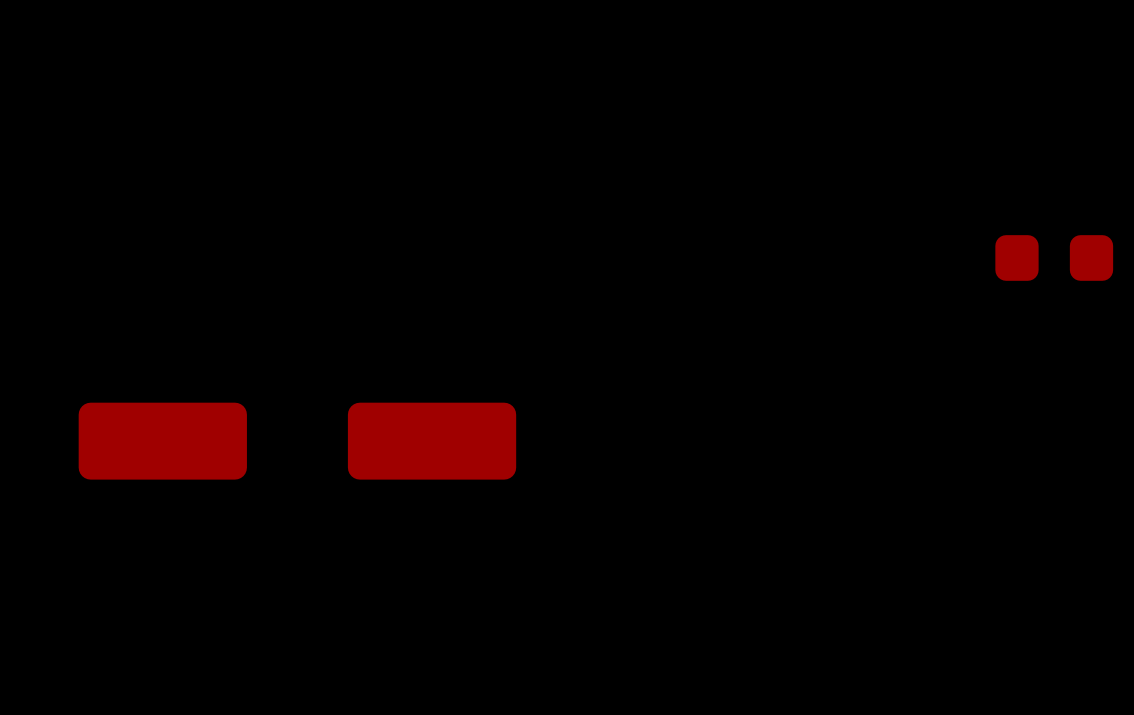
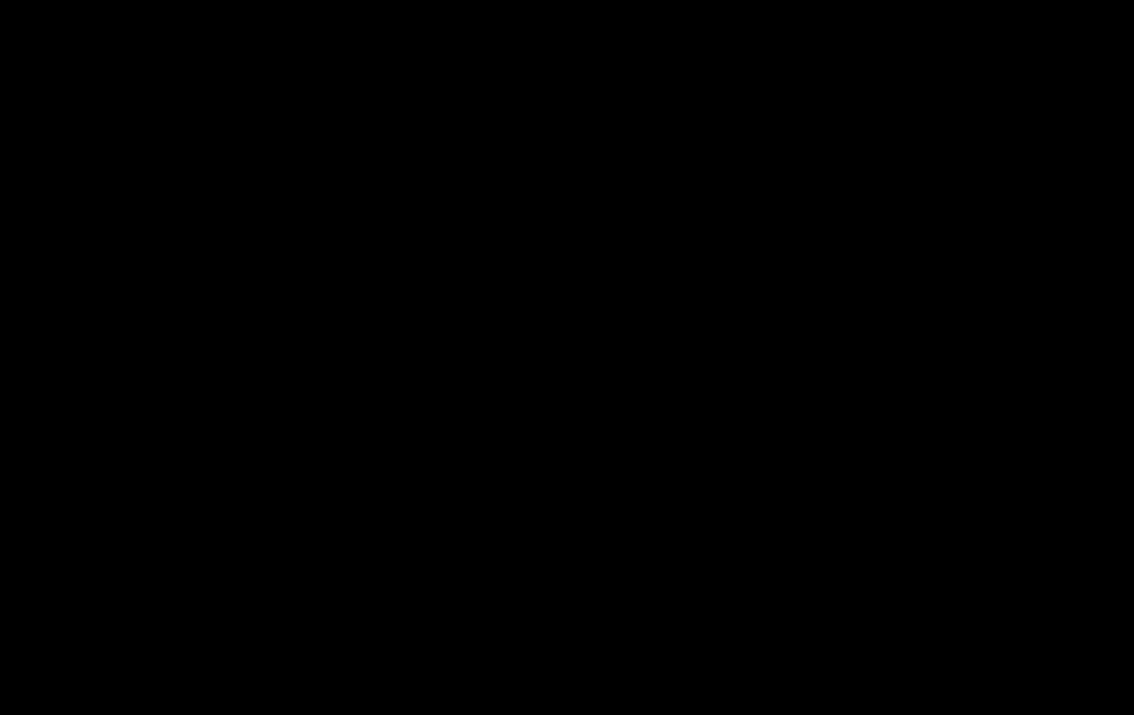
part: (1054, 257) -> none
part: (297, 441) -> none

